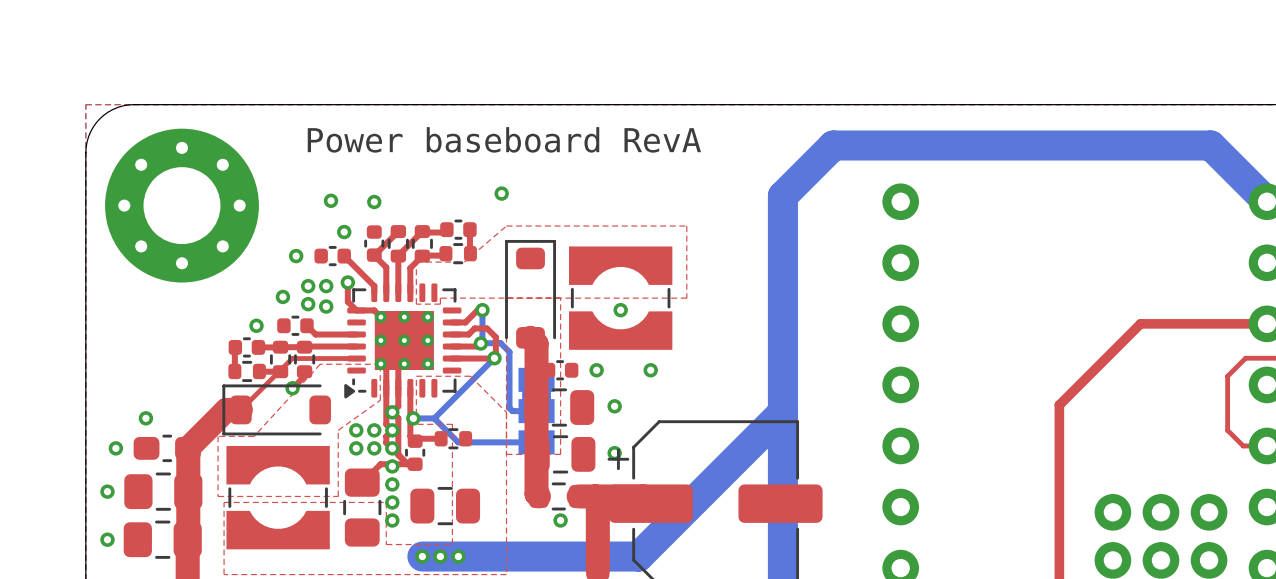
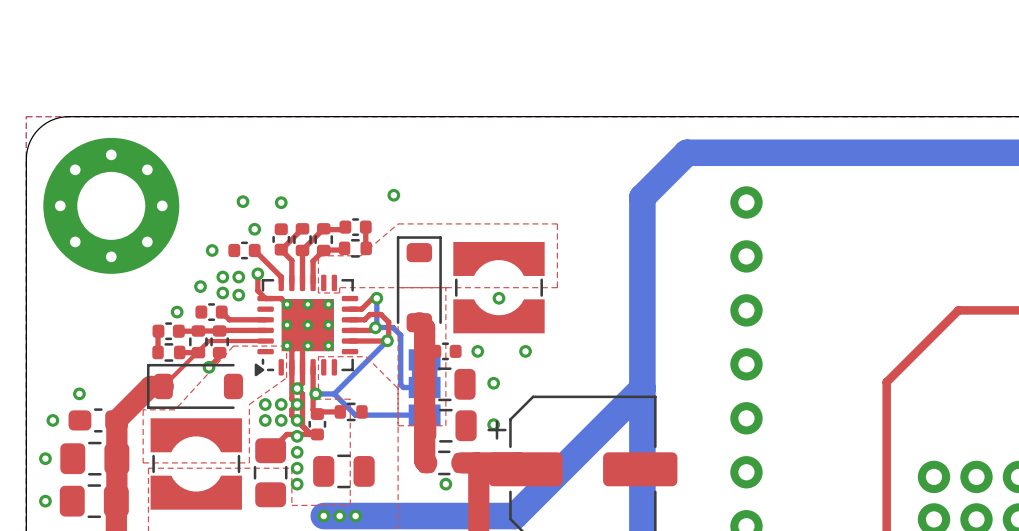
text: Power baseboard RevA (504, 139) -> none

